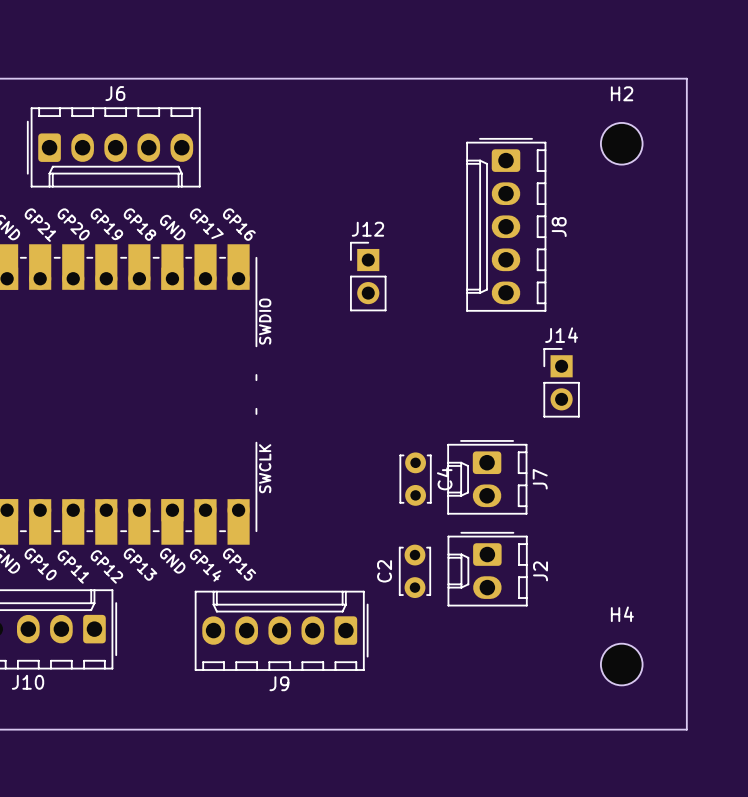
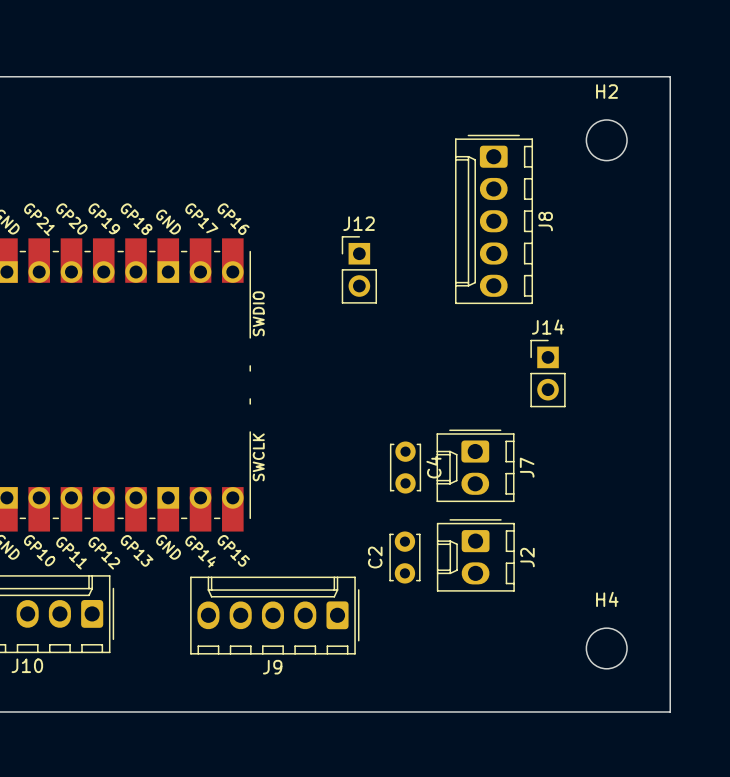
J6: (113, 147) -> none

